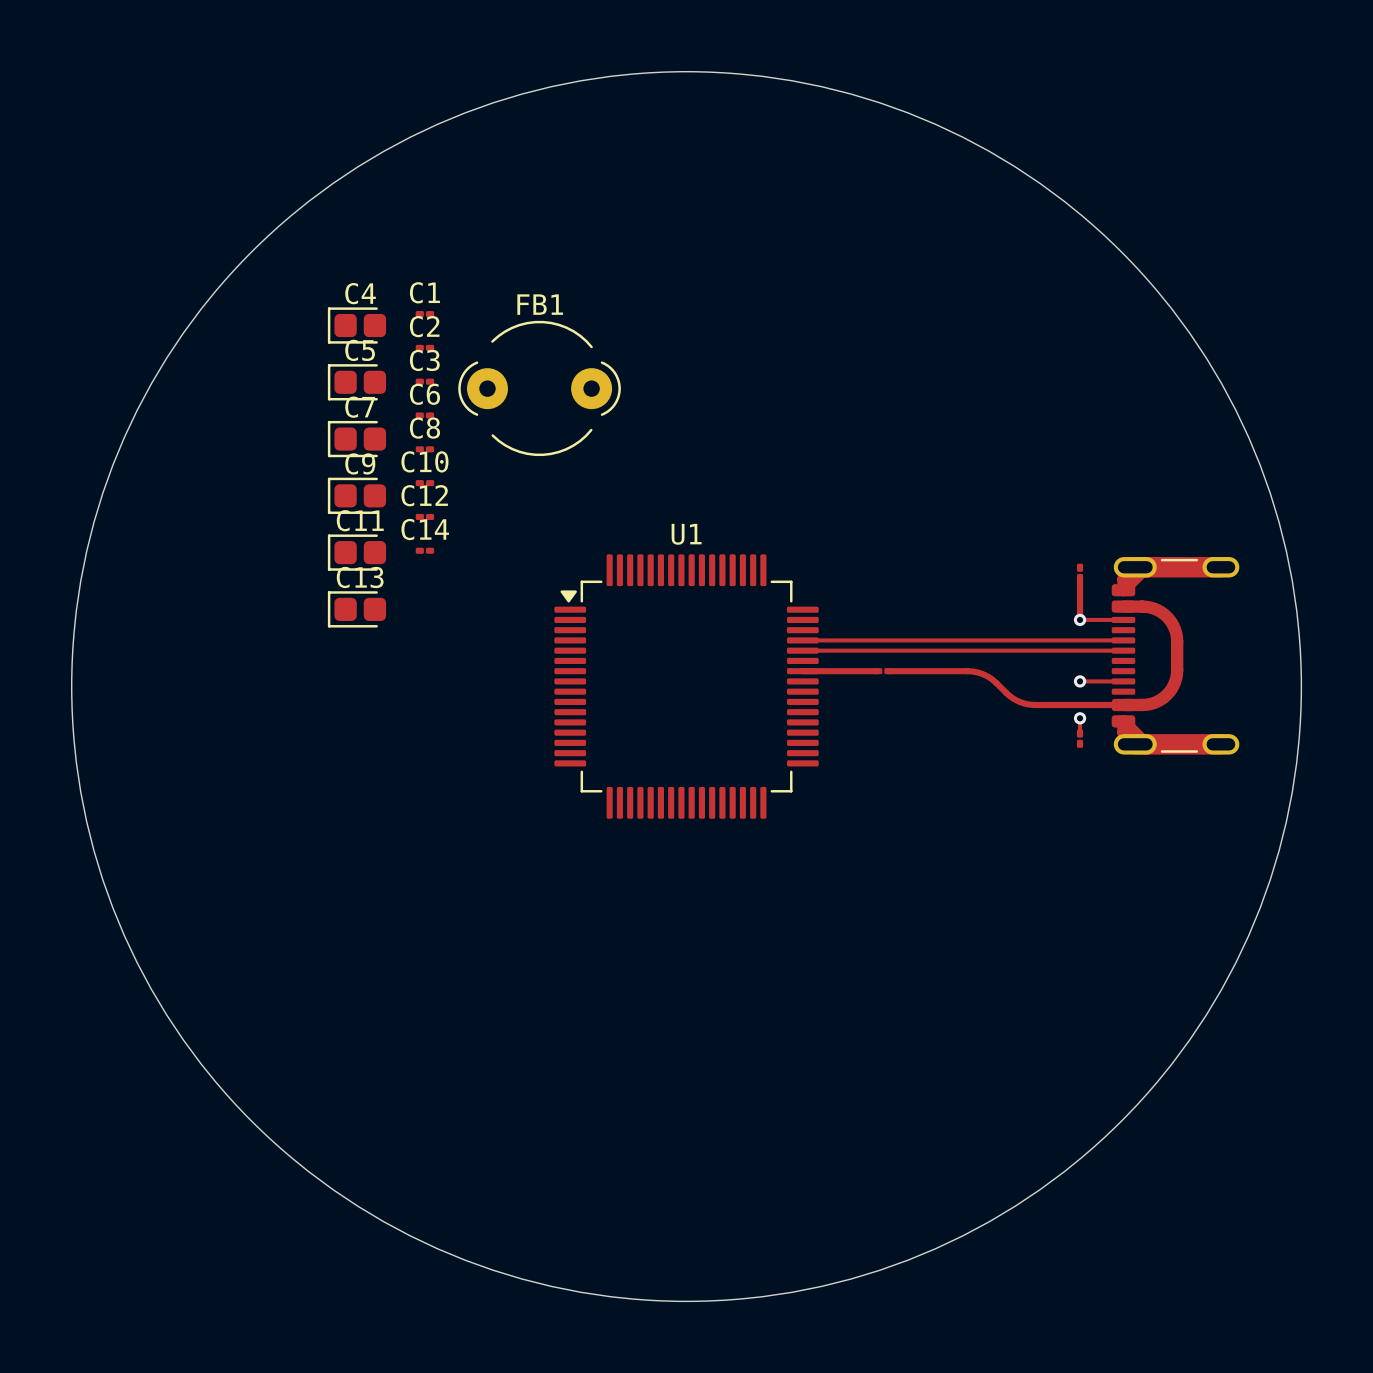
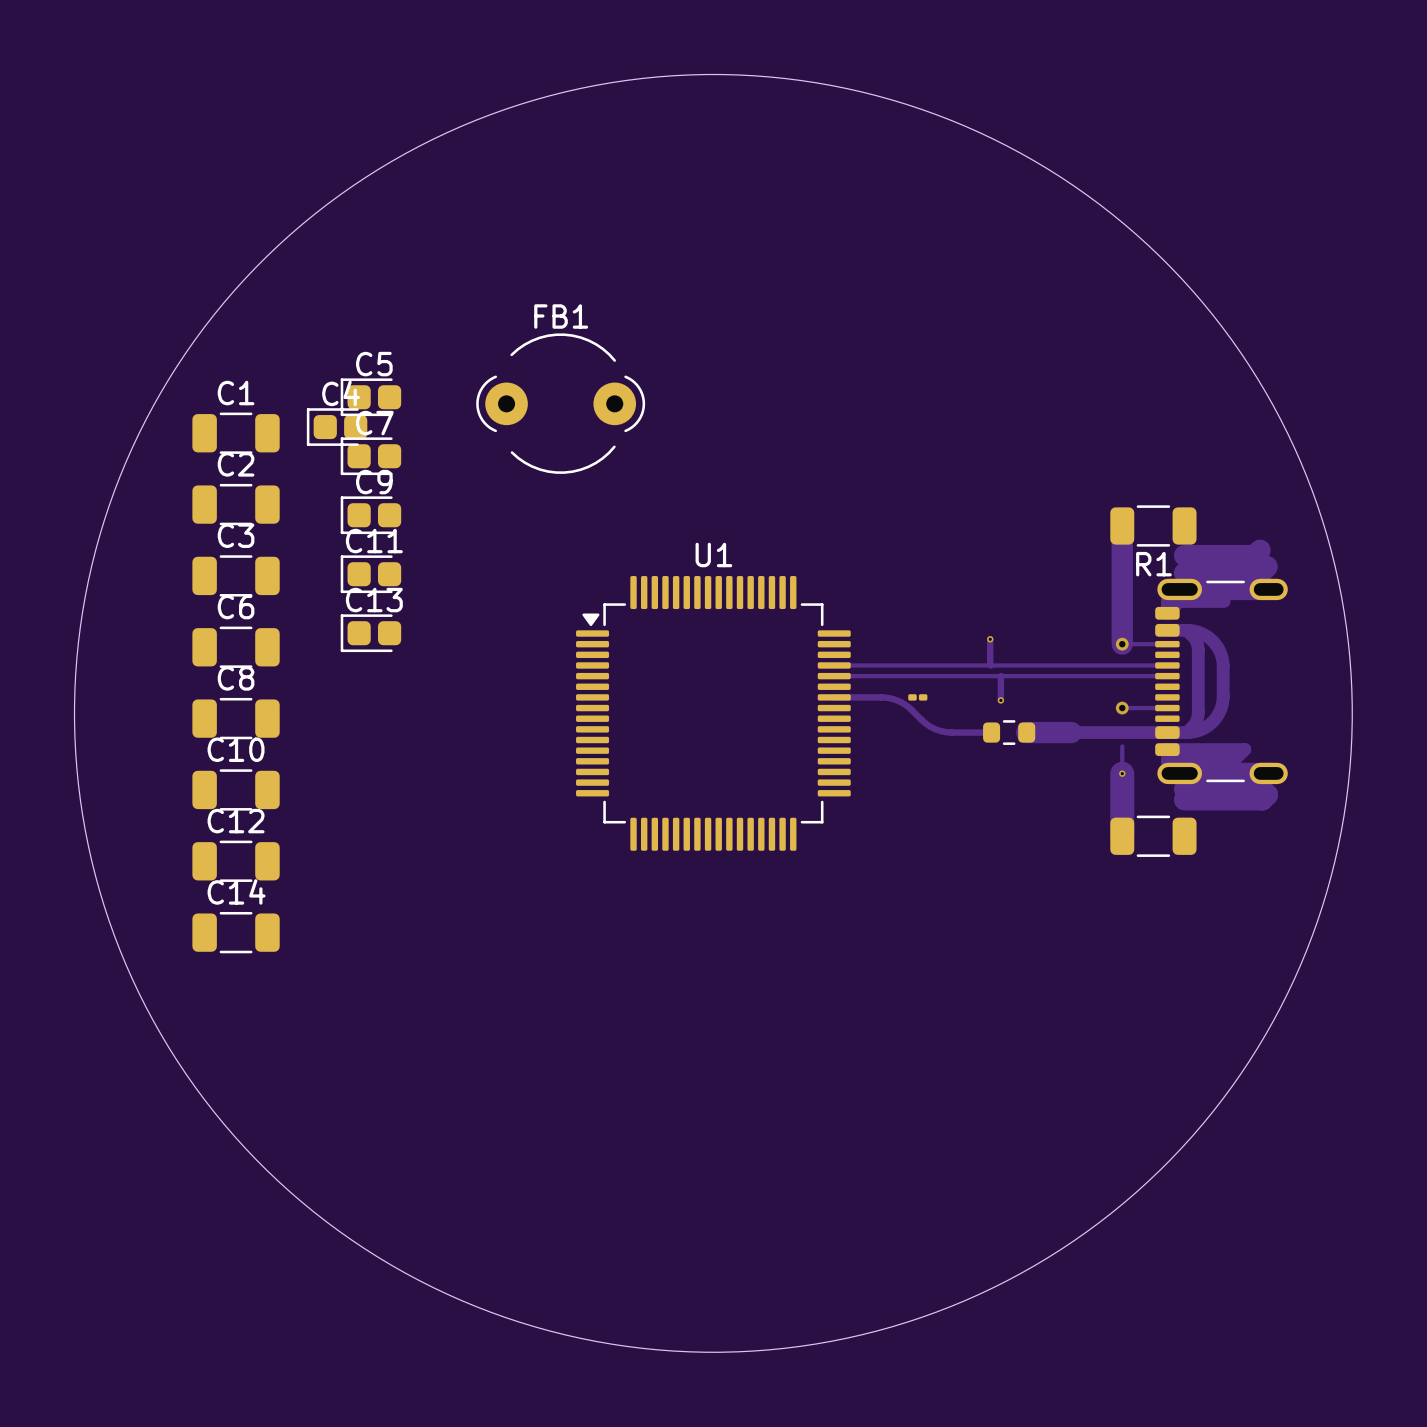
C1 footprint: [415, 310, 435, 318] -> [192, 412, 280, 454]
C4 position: (356, 325) -> (337, 427)
C2 footprint: [415, 344, 435, 351] -> [192, 483, 280, 526]
C3 footprint: [415, 378, 435, 385] -> [192, 555, 280, 597]
C6 footprint: [415, 412, 435, 419] -> [192, 626, 280, 668]
C8 footprint: [415, 446, 435, 453] -> [192, 697, 280, 740]
C10 footprint: [415, 480, 435, 487] -> [192, 769, 280, 811]
track: none -> (1122, 525) (1122, 601)
R1: none -> (1153, 525)
C12 footprint: [415, 513, 435, 521] -> [192, 840, 280, 882]
track: none -> (1260, 550) (1254, 555) (1184, 555)
track: none -> (1267, 566) (1260, 573) (1184, 573)
C14 footprint: [415, 547, 435, 554] -> [192, 911, 280, 954]
part: (1080, 572) -> none
track: none -> (1179, 601) (1224, 601)
track width: thin (1080, 579) (1080, 619) -> thick (1122, 601) (1122, 644)
track: none -> (1187, 630) (1195, 640) (1198, 650) (1198, 714) (1194, 724) (1187, 732)
track: none -> (990, 639) (990, 665)
via: none -> (990, 639)
track: none -> (1001, 676) (1000, 700)
track: (848, 671) (877, 671) -> (881, 697) (901, 702) (925, 723) (940, 731) (991, 732)
track: (889, 671) (978, 672) (992, 679) (1016, 700) (1035, 704) -> (1026, 732) (1075, 732)
via: none -> (1000, 700)
part: none -> (1009, 732)
track width: thin (1035, 704) (1123, 704) -> thick (1075, 732) (1167, 732)
via: (1080, 718) -> none
track: none -> (1167, 749) (1244, 749) (1234, 760) (1178, 760)
part: (1080, 738) -> none
track: none -> (1122, 773) (1122, 836)
via: none -> (1122, 773)
track: none -> (1184, 788) (1261, 788) (1267, 794) (1262, 799) (1184, 799)
part: none -> (1153, 836)

